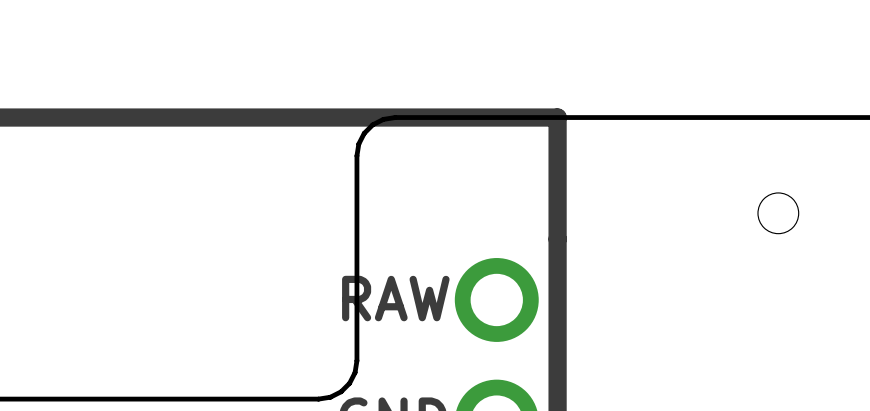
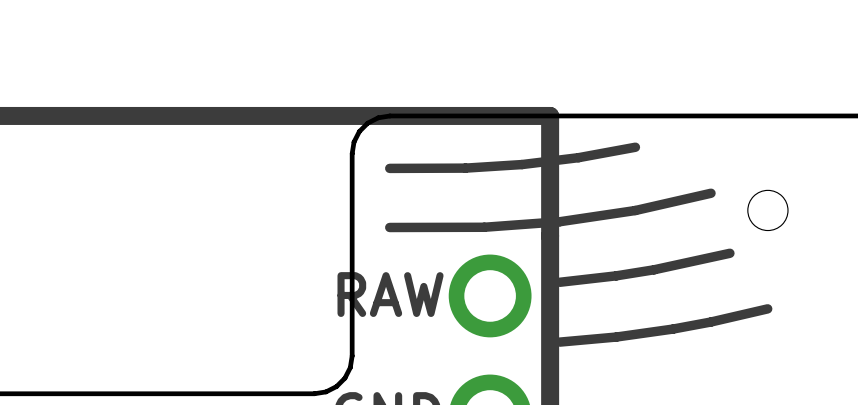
line: none -> (635, 147) (578, 157) (522, 164) (465, 168) (389, 168)
line: none -> (711, 193) (635, 210) (559, 221) (484, 227) (389, 227)
line: none -> (729, 253) (654, 269) (559, 282)
line: none -> (767, 308) (673, 329) (559, 342)

